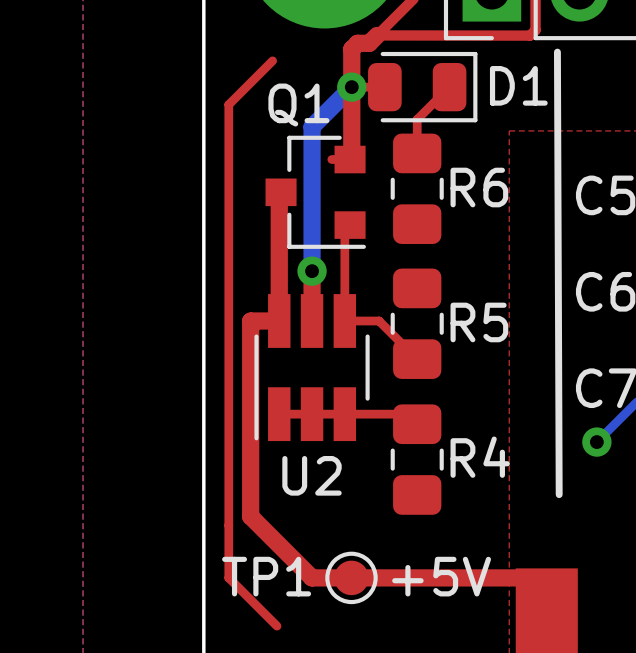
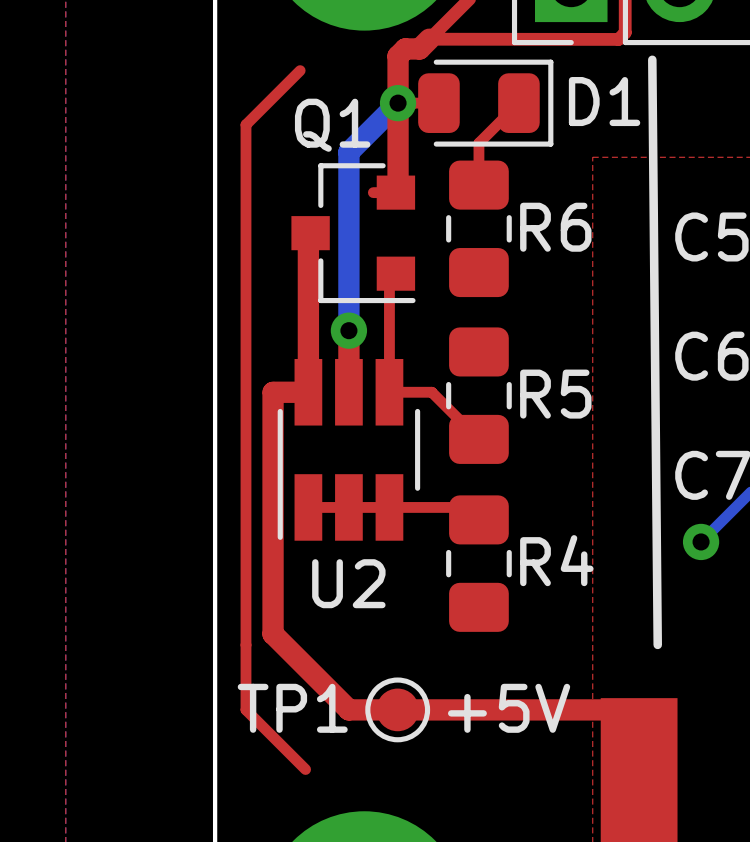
line: (557, 52) (559, 494) -> (652, 59) (657, 644)

